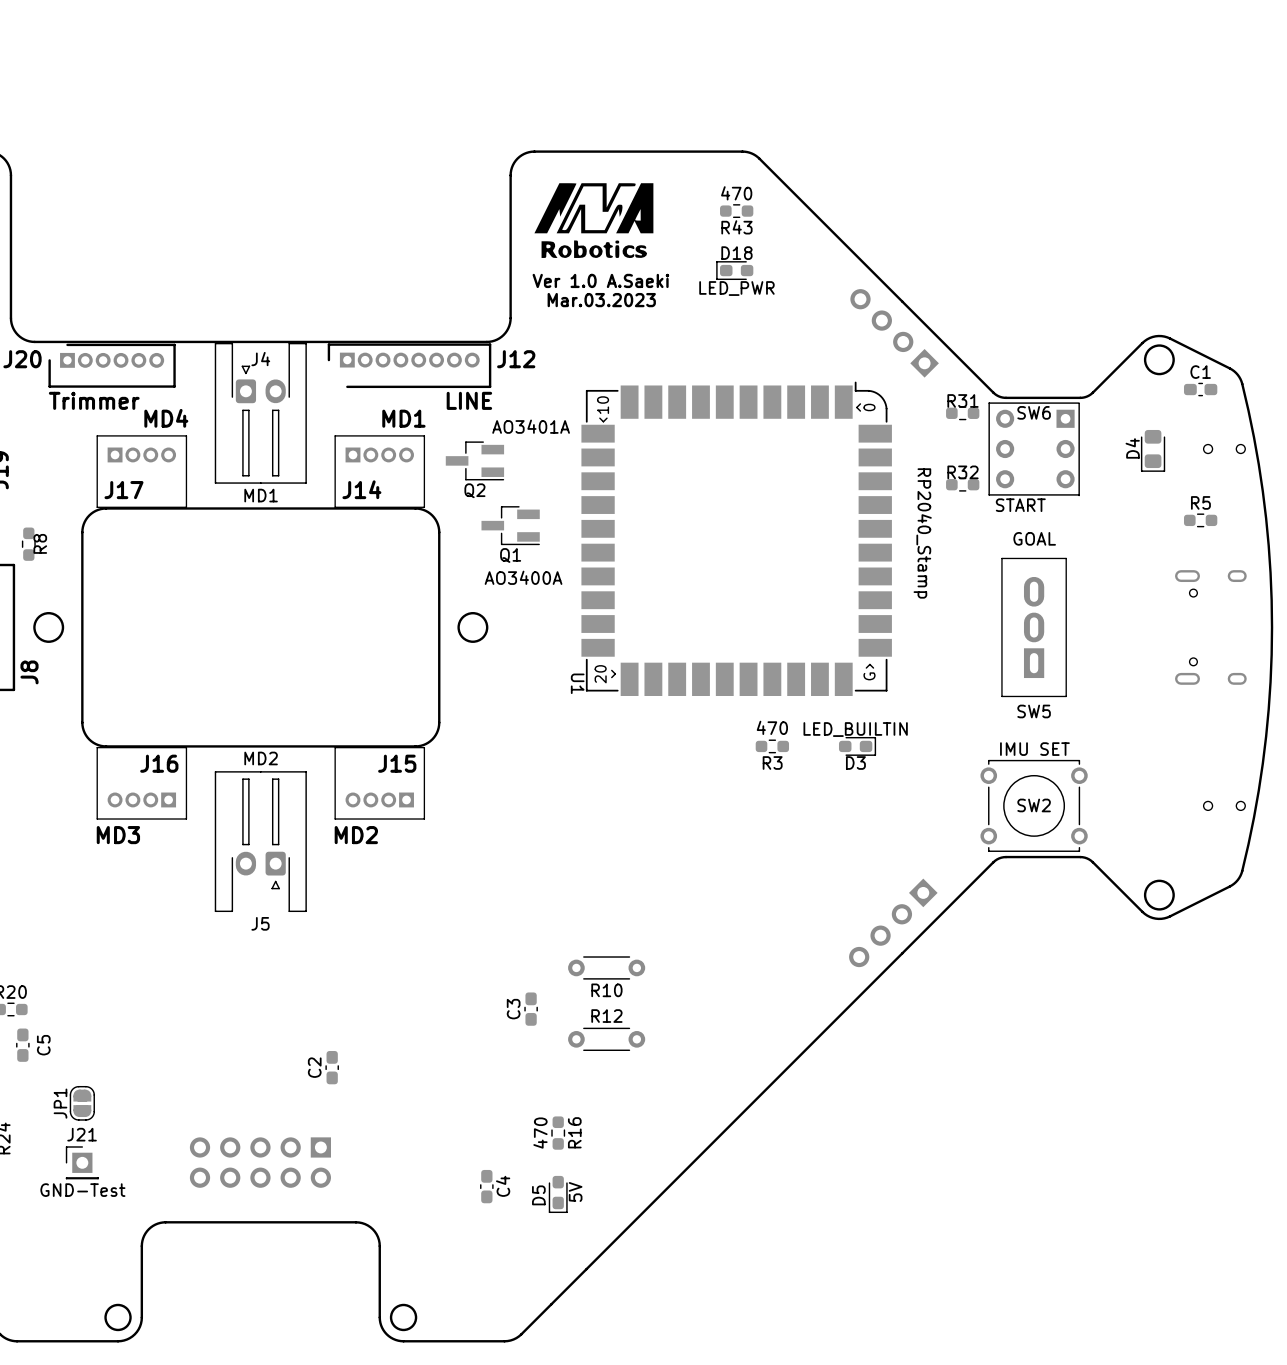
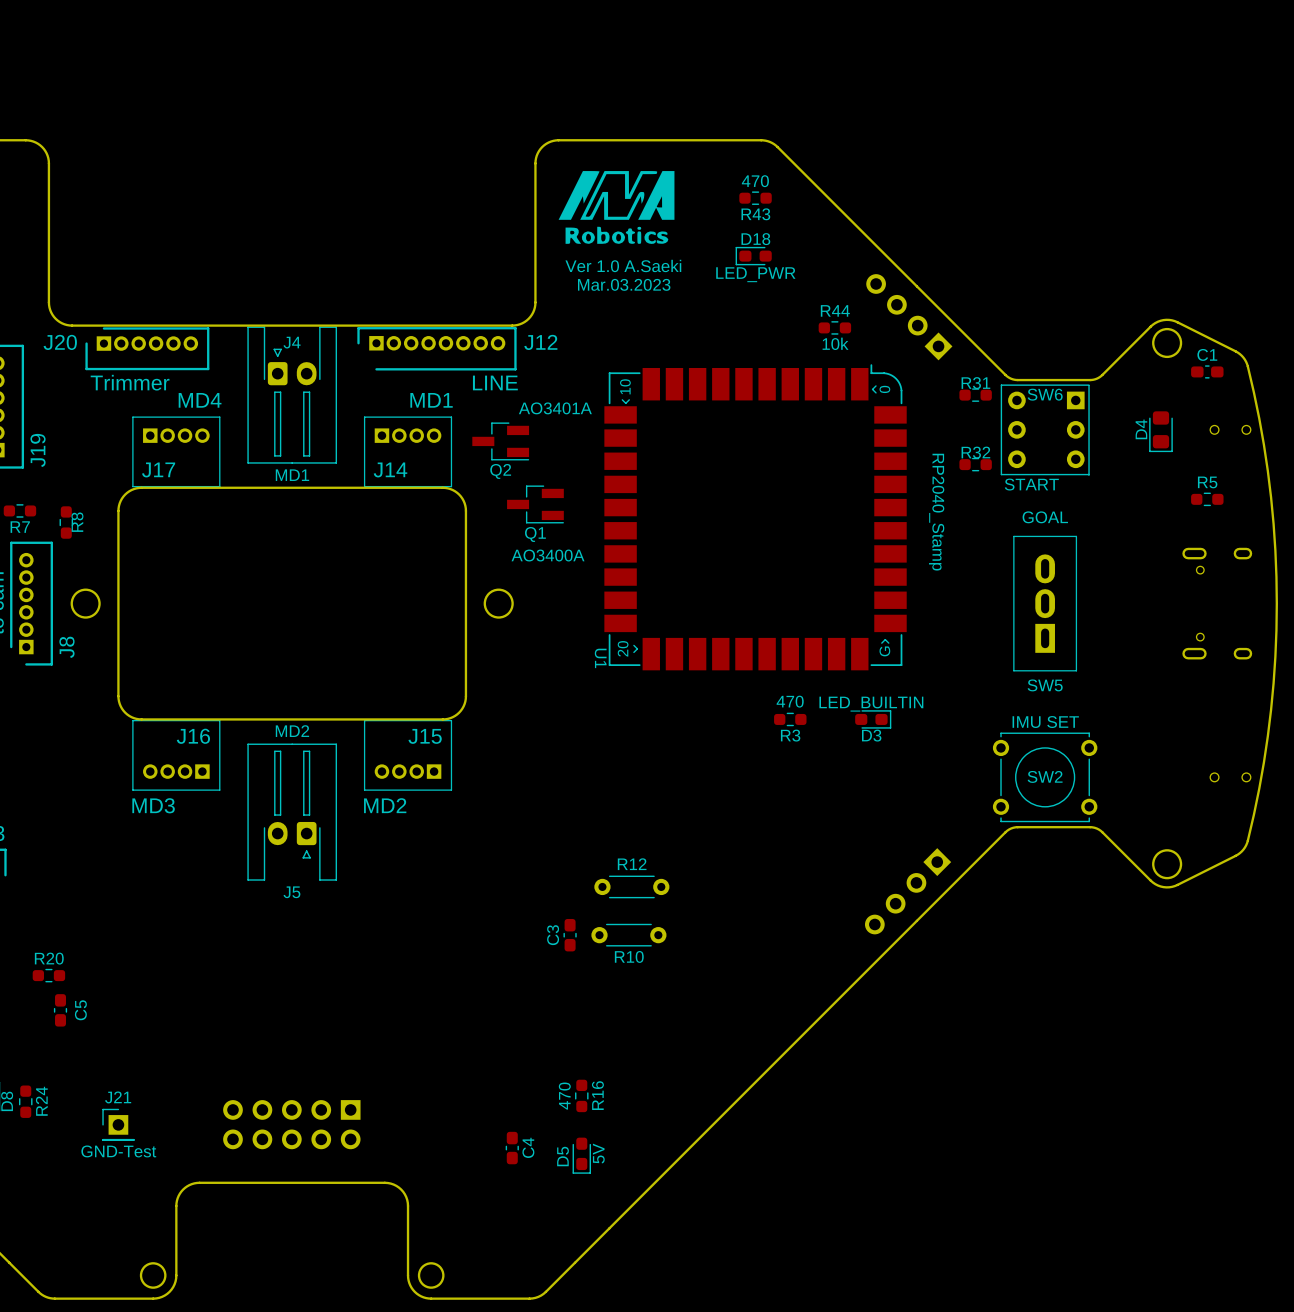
R44: none -> 10k (834, 327)
C3 position: (531, 1009) -> (570, 935)
R12 position: (606, 1039) -> (631, 886)
C2: (332, 1067) -> none
JP1: (82, 1103) -> none

